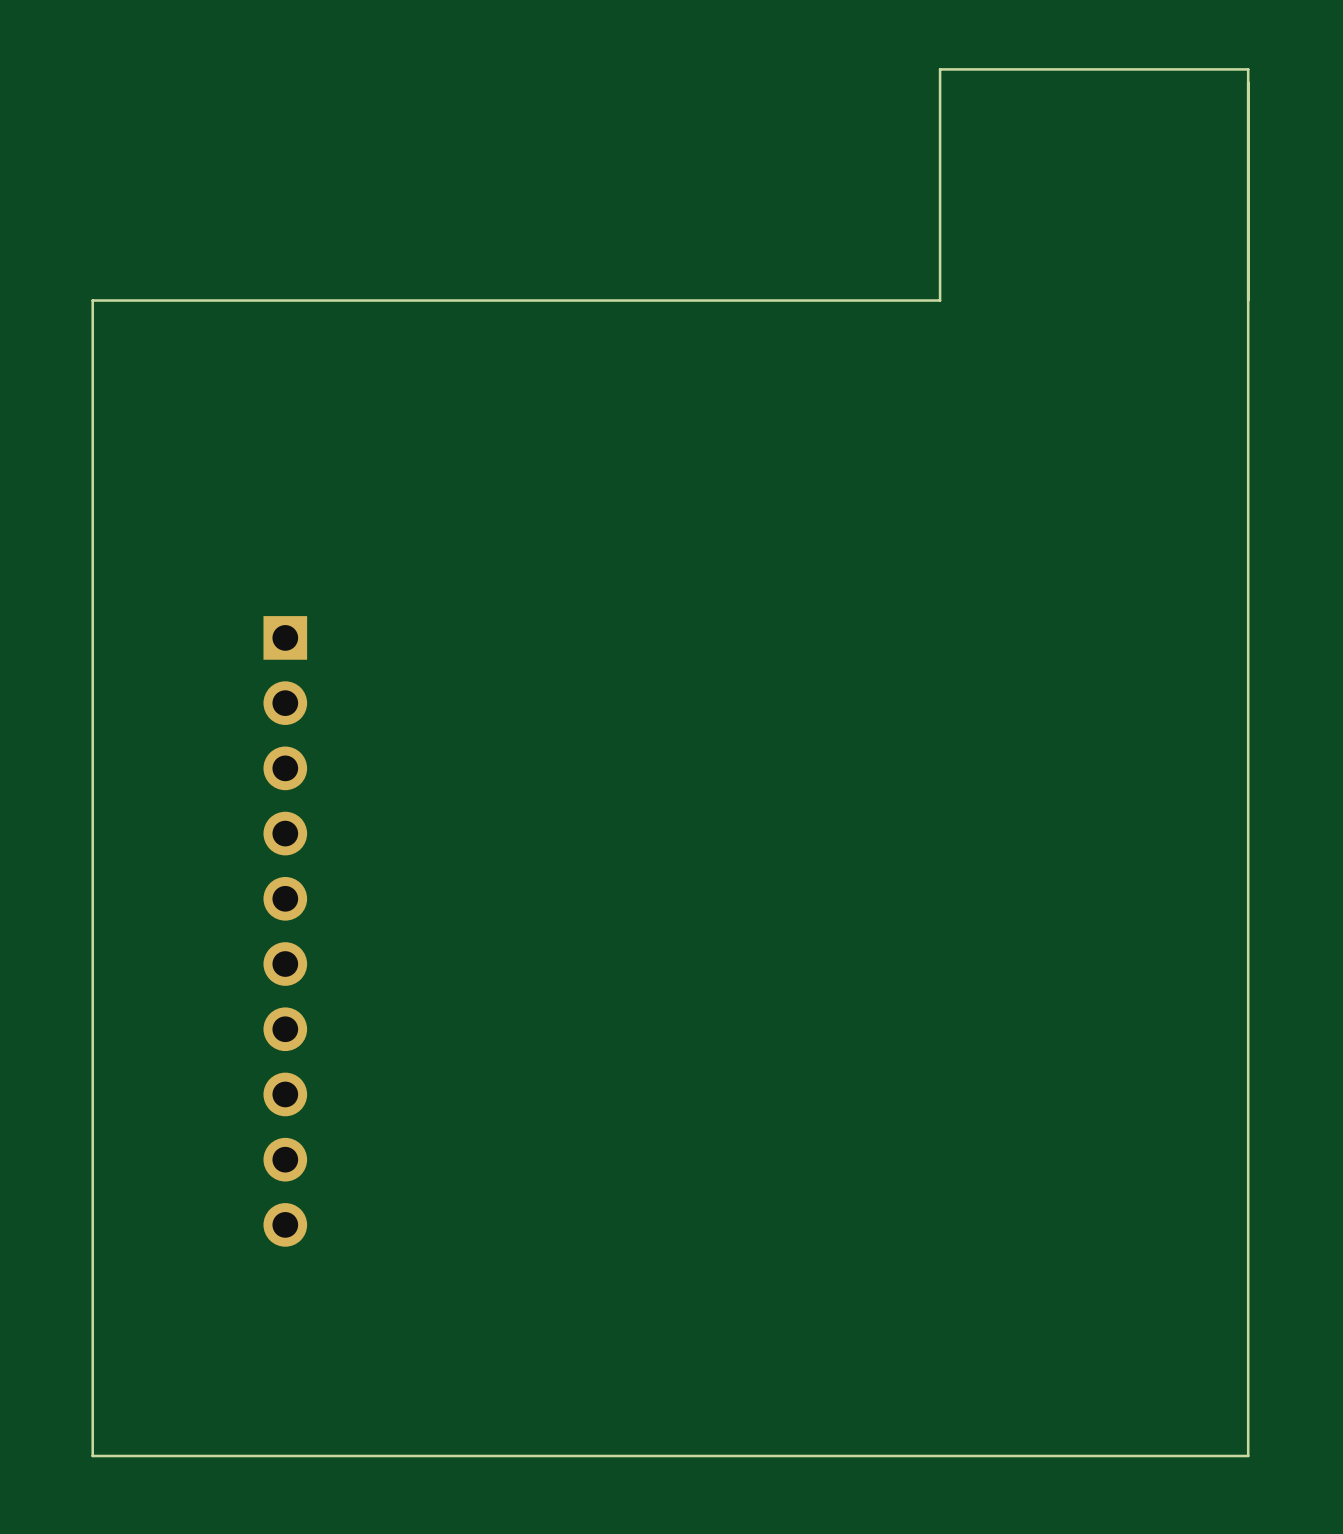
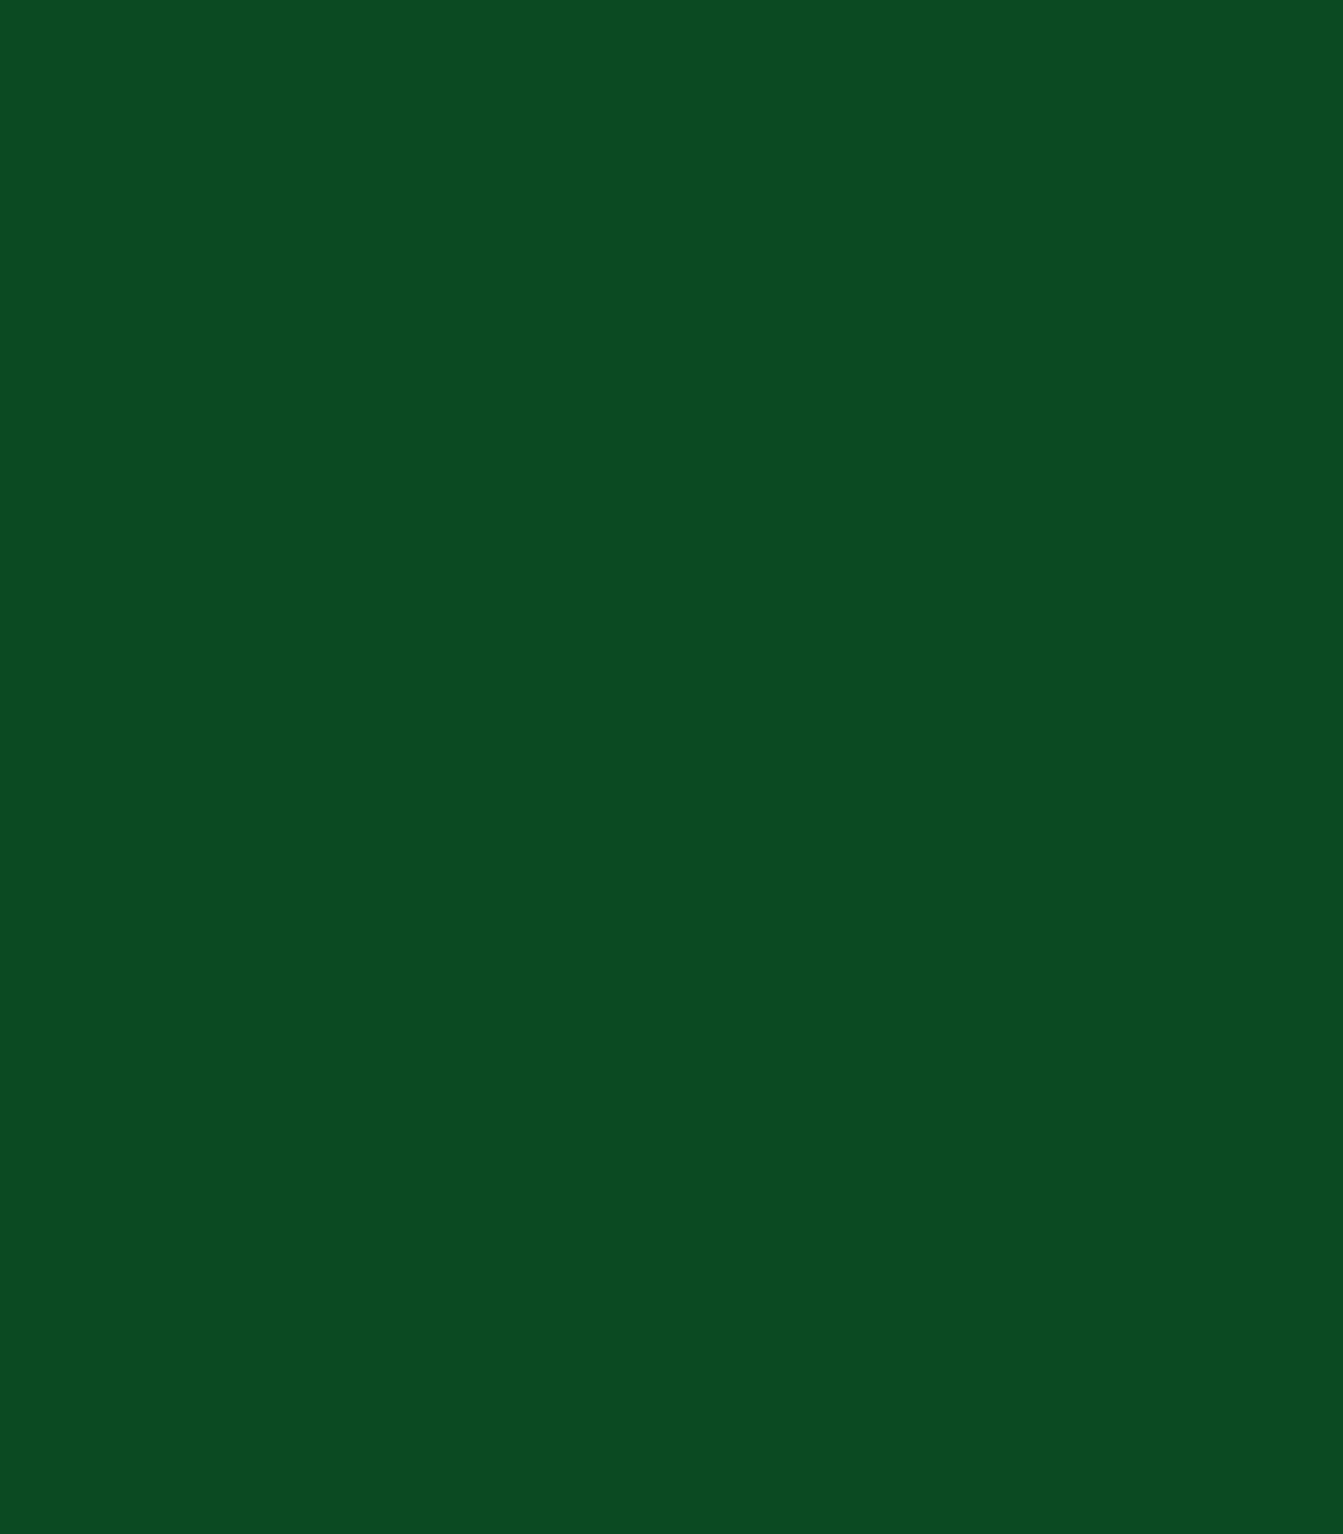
board edge: (1248, 69) (1248, 1456) (92, 1456) (92, 300) (940, 300) (940, 69) (1248, 69) -> none
part: (285, 931) -> none

